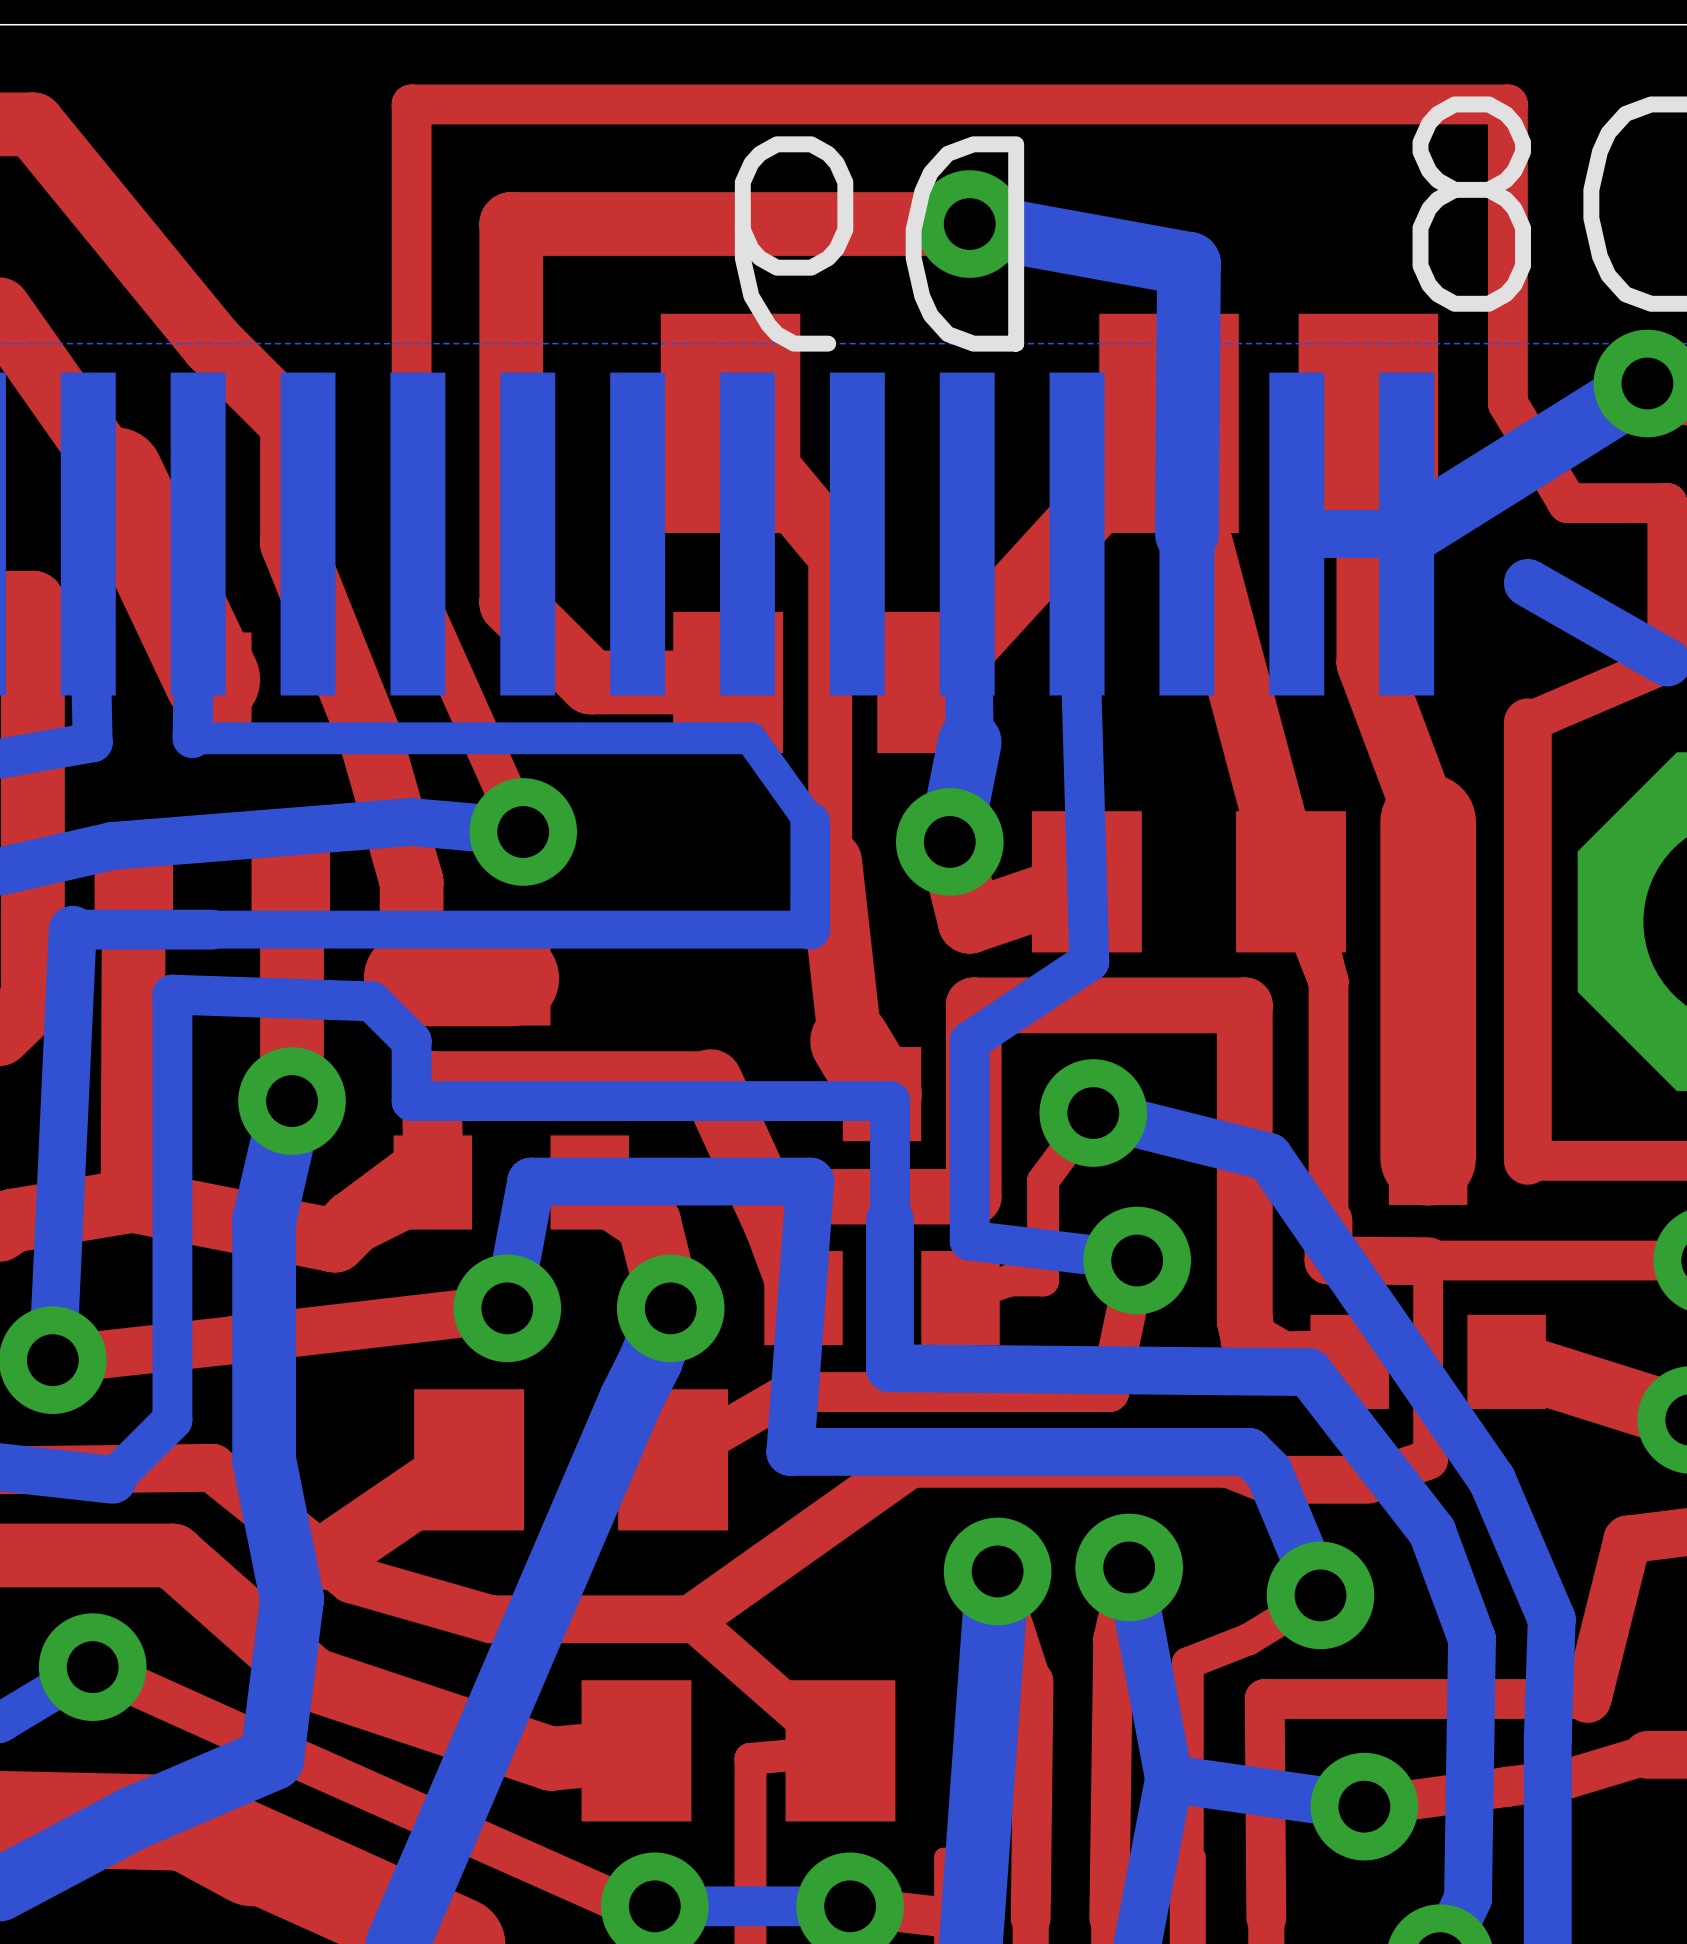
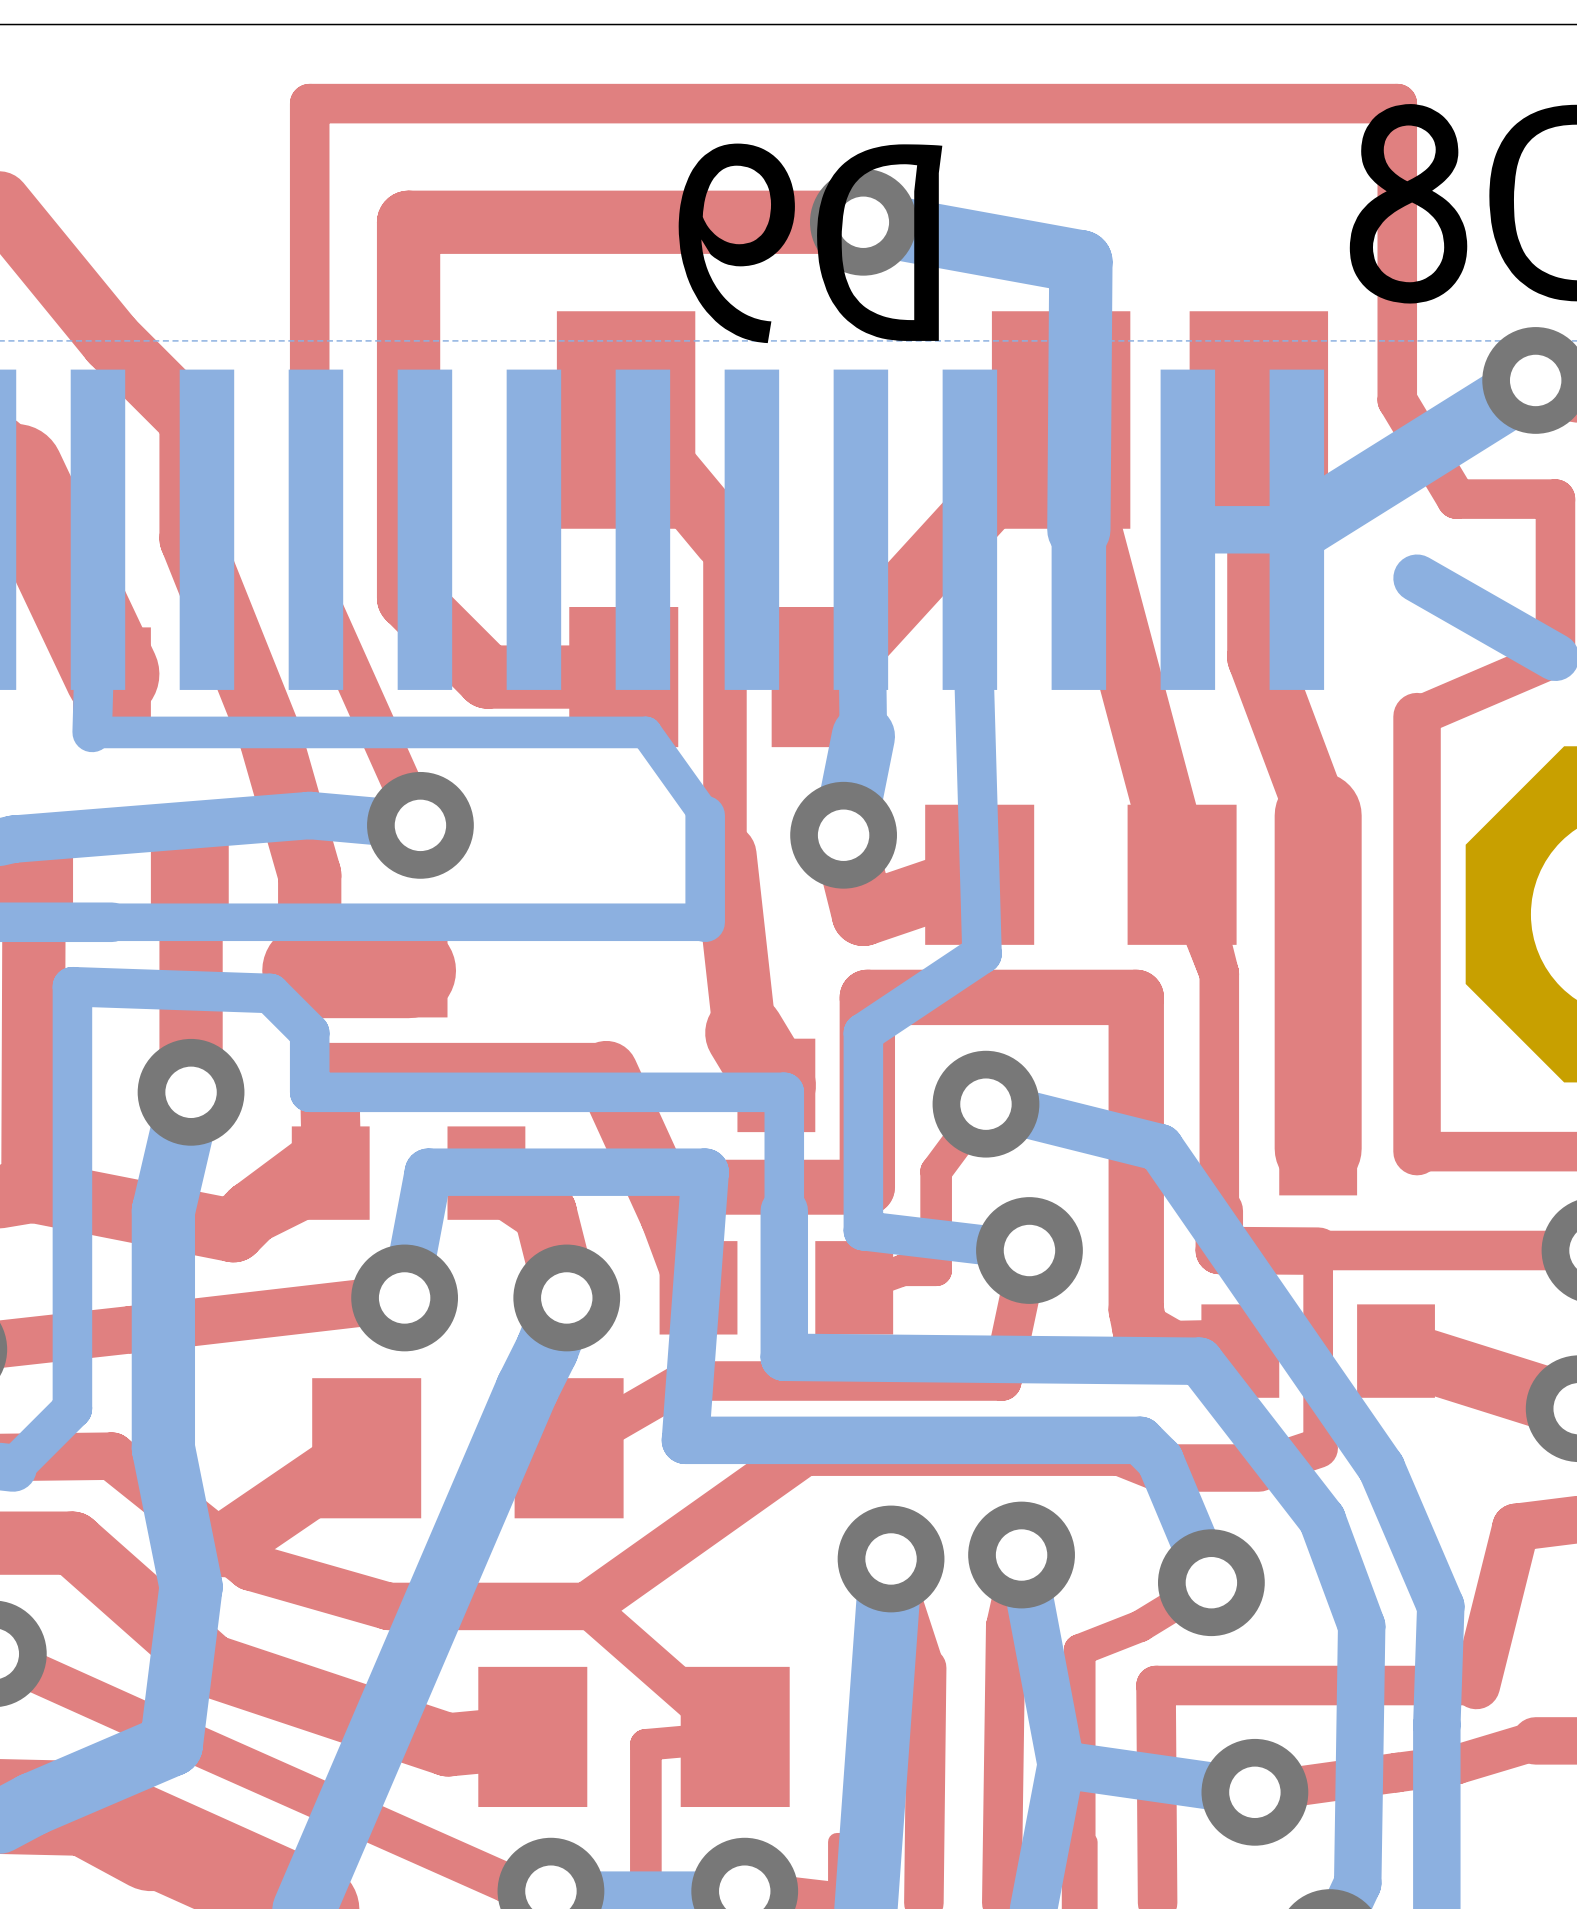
top track width: thick (1428, 822) (1428, 1157) -> thin (1318, 815) (1318, 1148)

